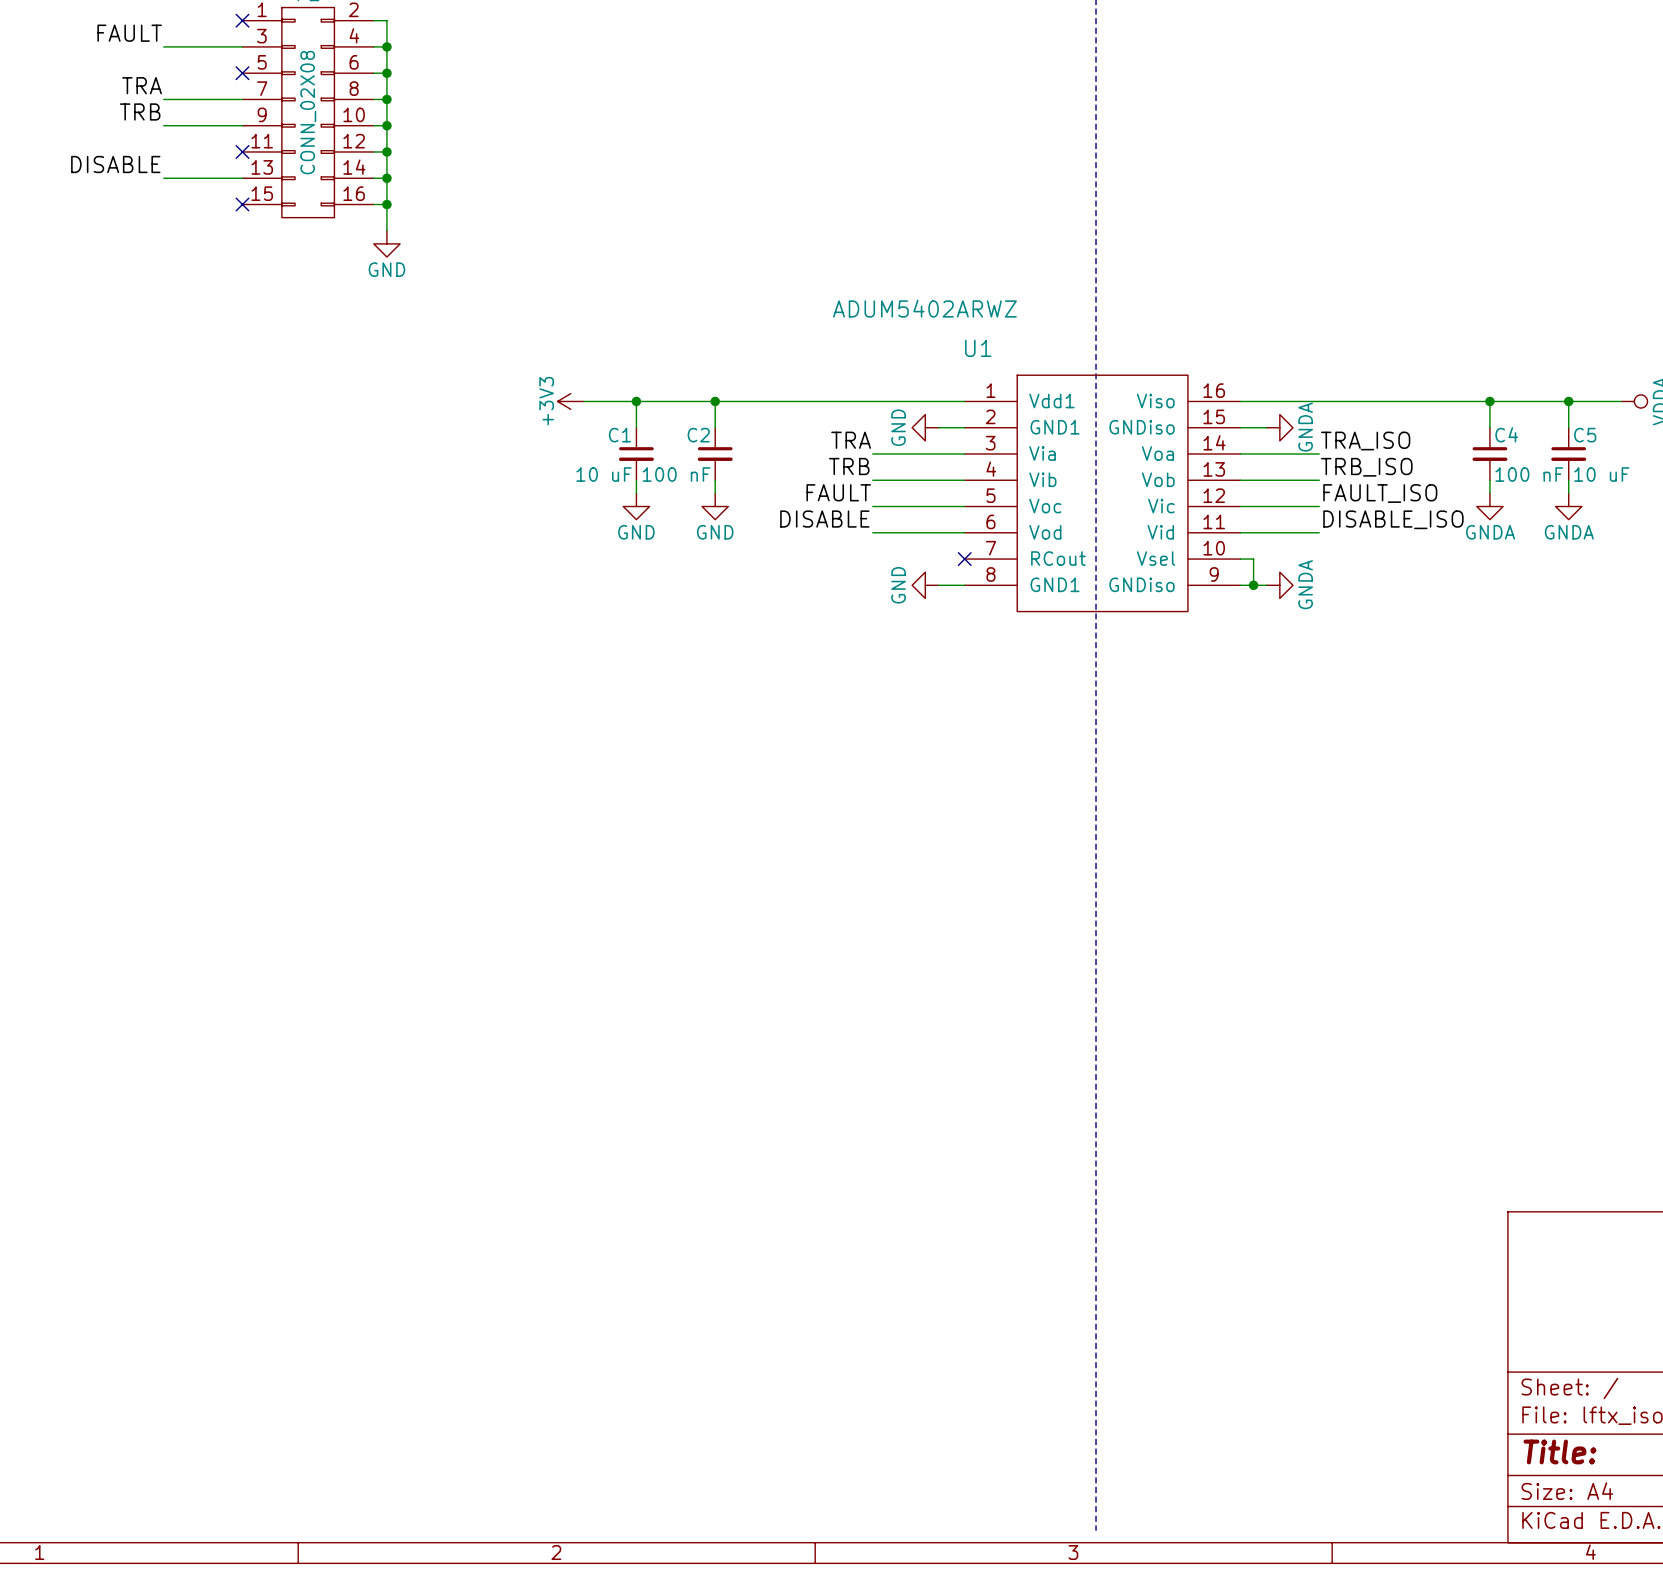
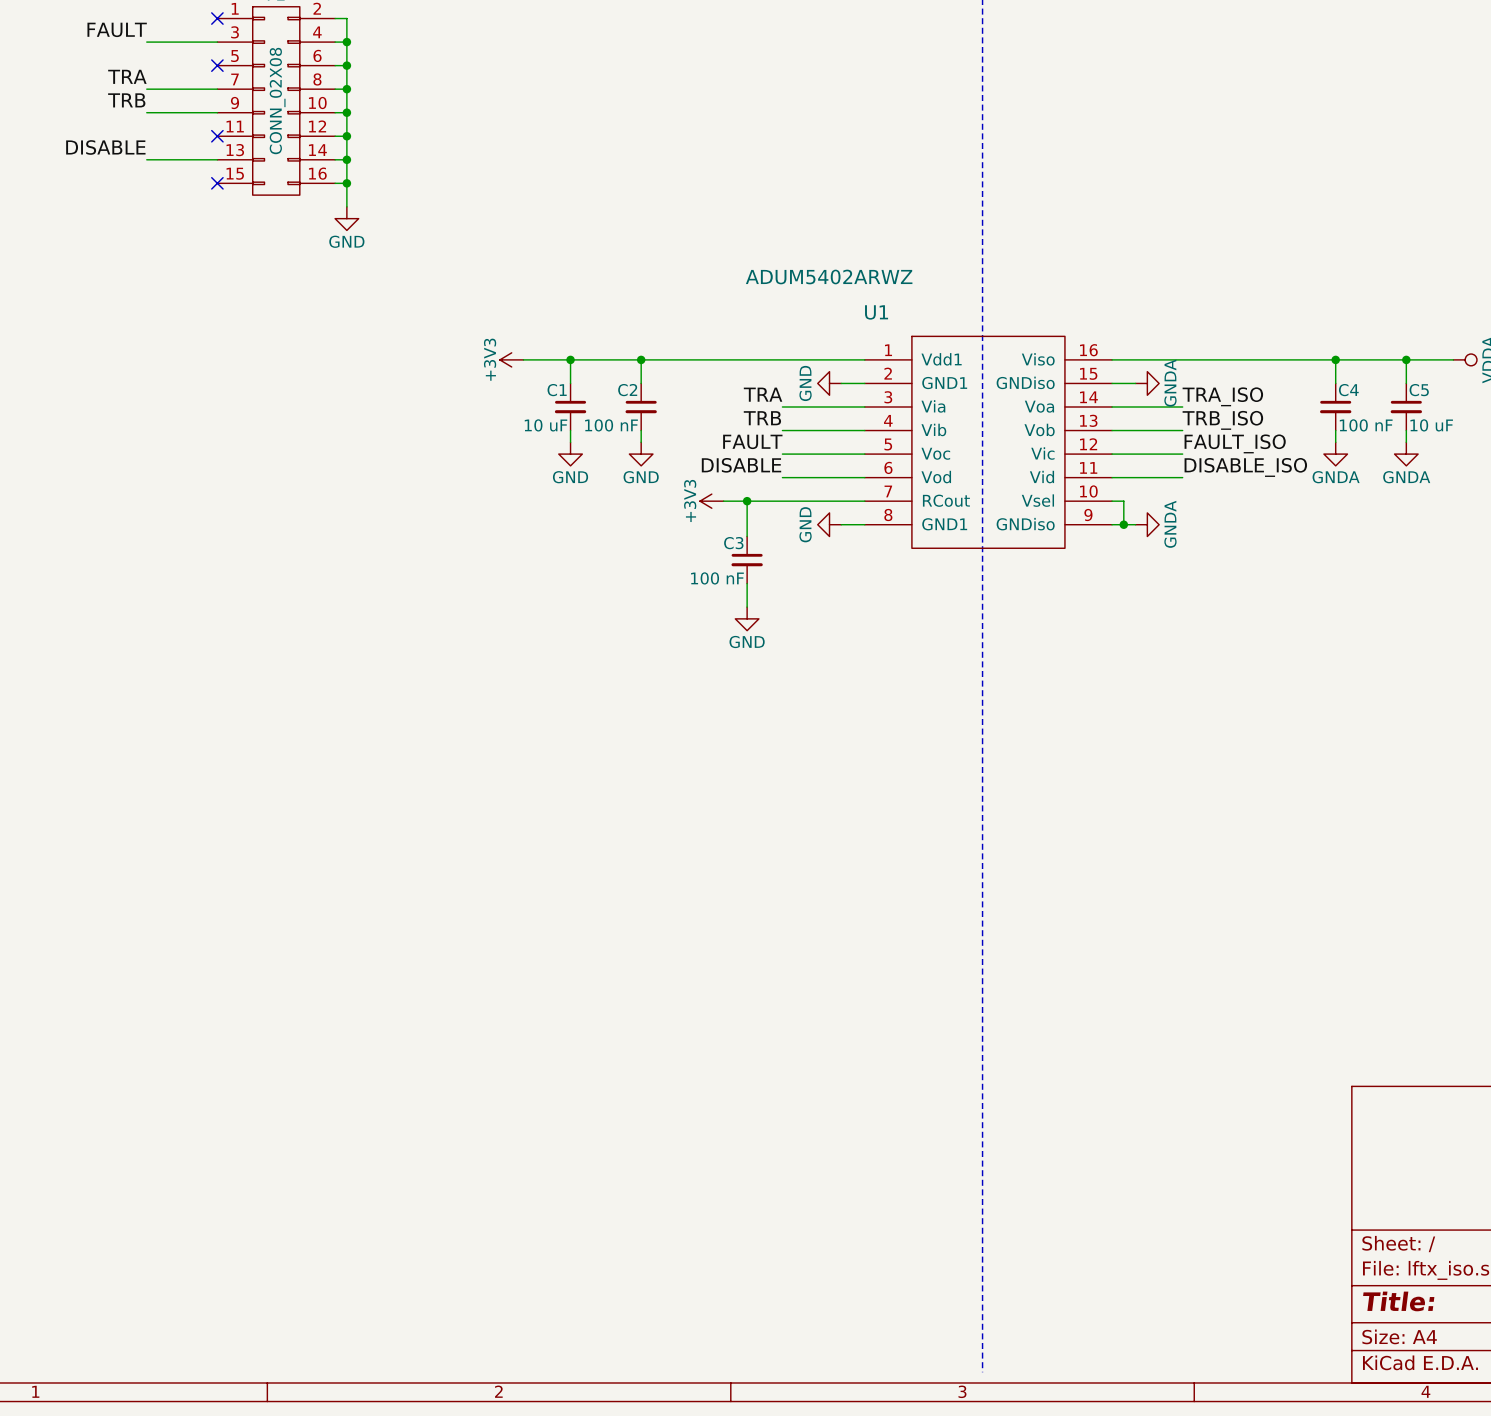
power symbol: none -> +3V3 (711, 501)
wire: none -> (723, 501) (864, 501)
wire: none -> (747, 501) (747, 536)
junction: none -> (747, 501)
no-connect mark: (964, 559) -> none
C3: none -> 100 nF (747, 560)
wire: none -> (747, 583) (747, 607)
power symbol: none -> GND (747, 618)

